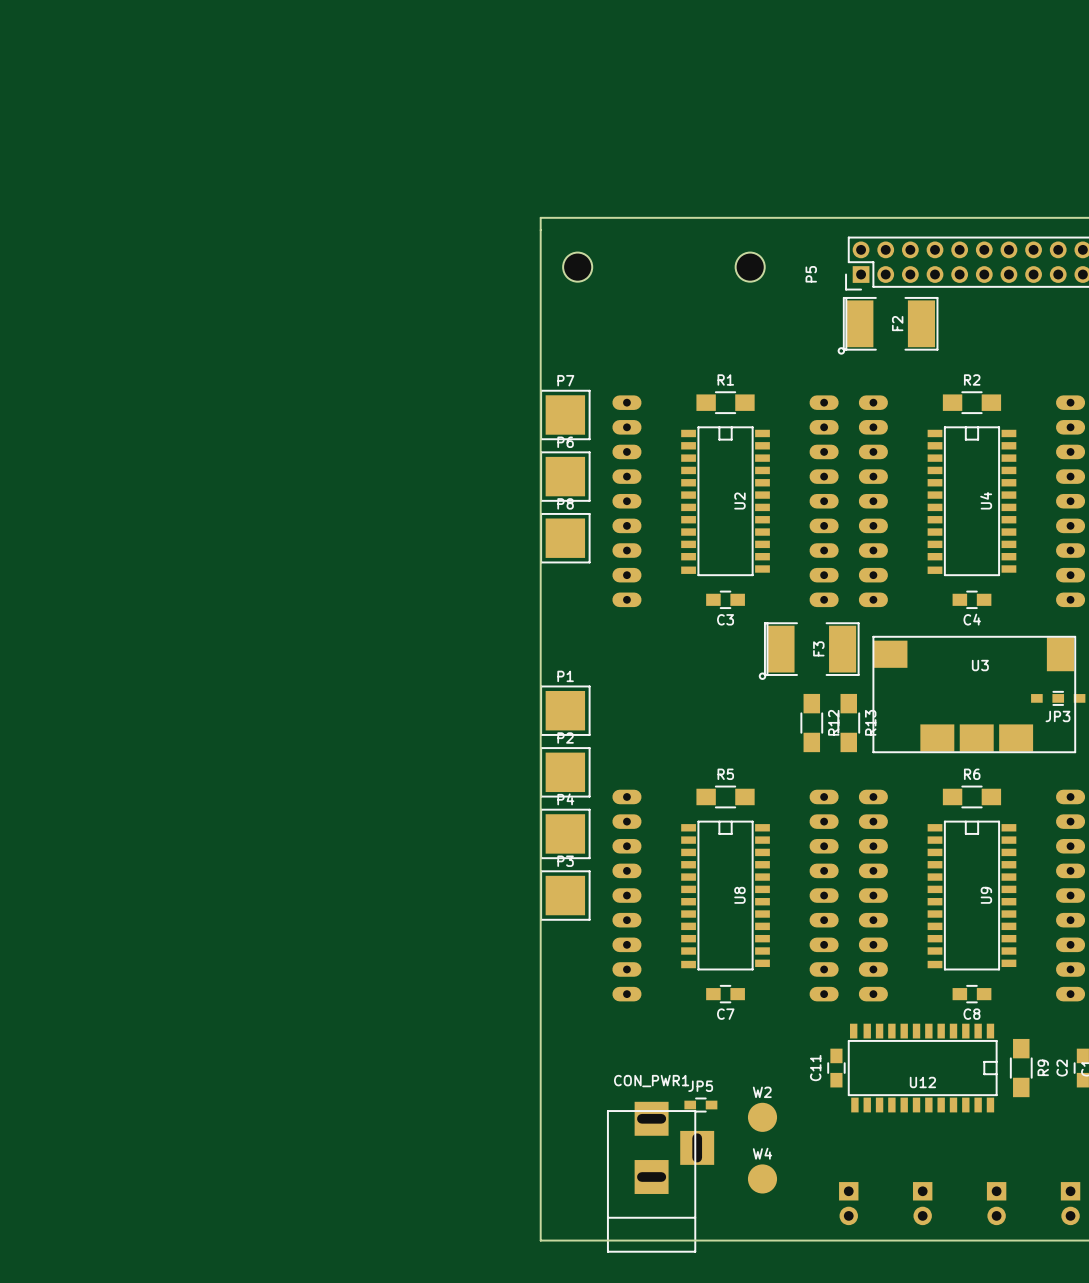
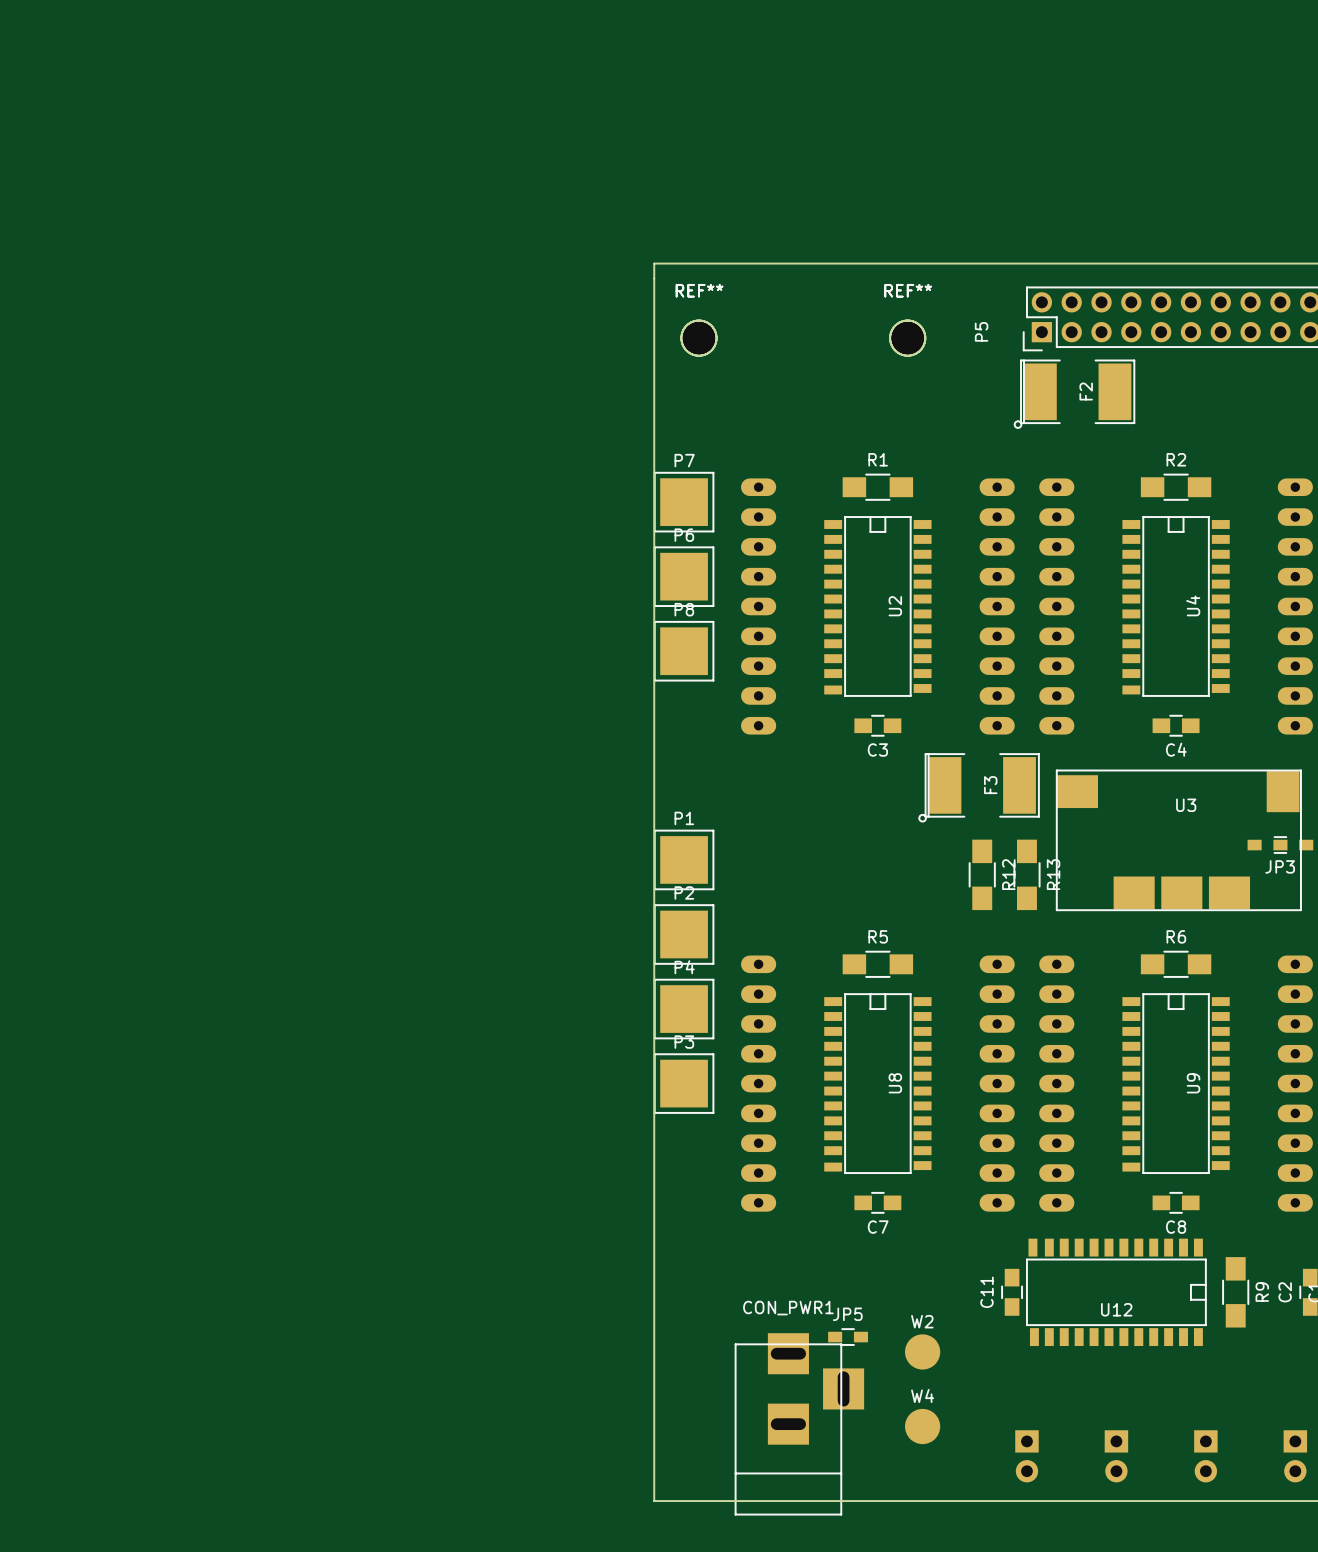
part: (577, 267) -> none
part: (750, 267) -> none
REF**: none -> (698, 338)
REF**: none -> (907, 338)

